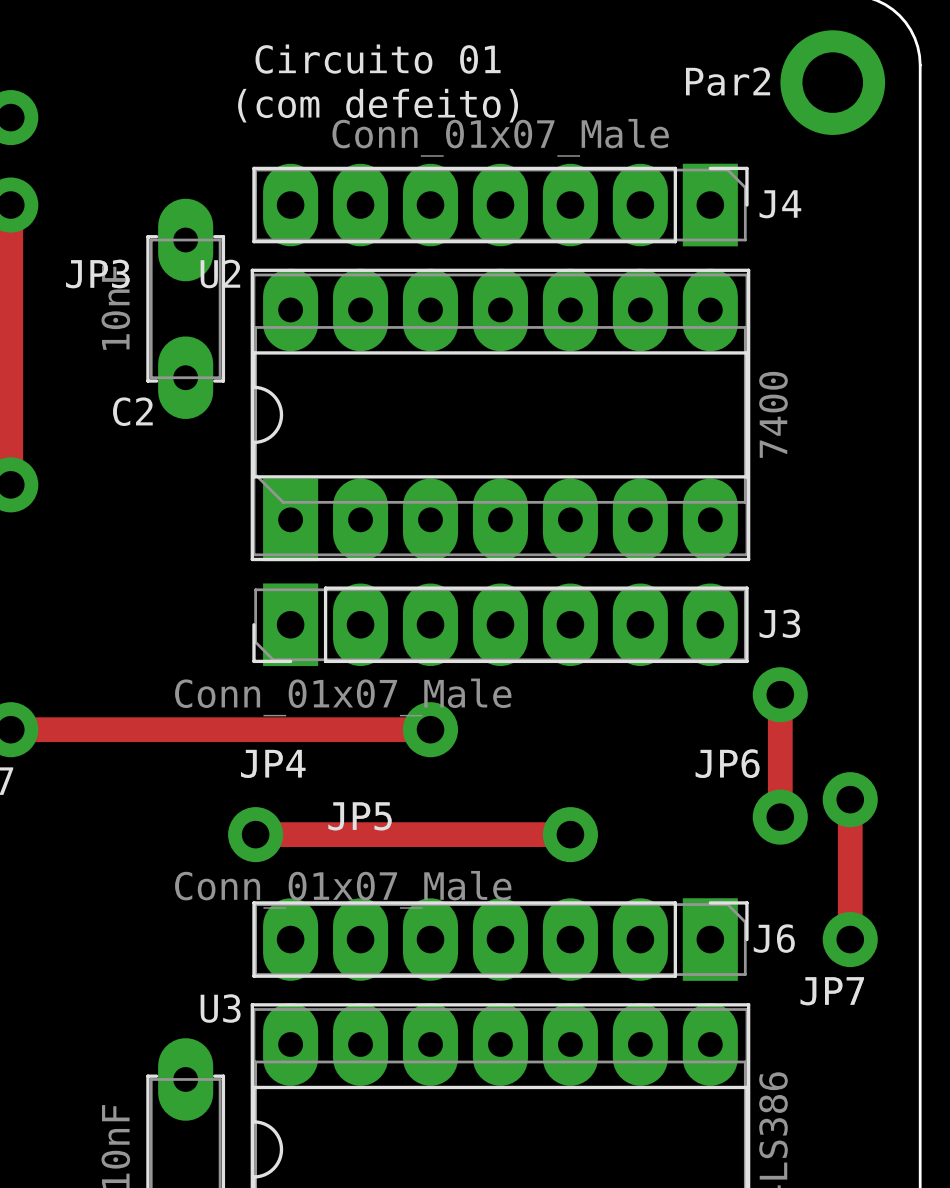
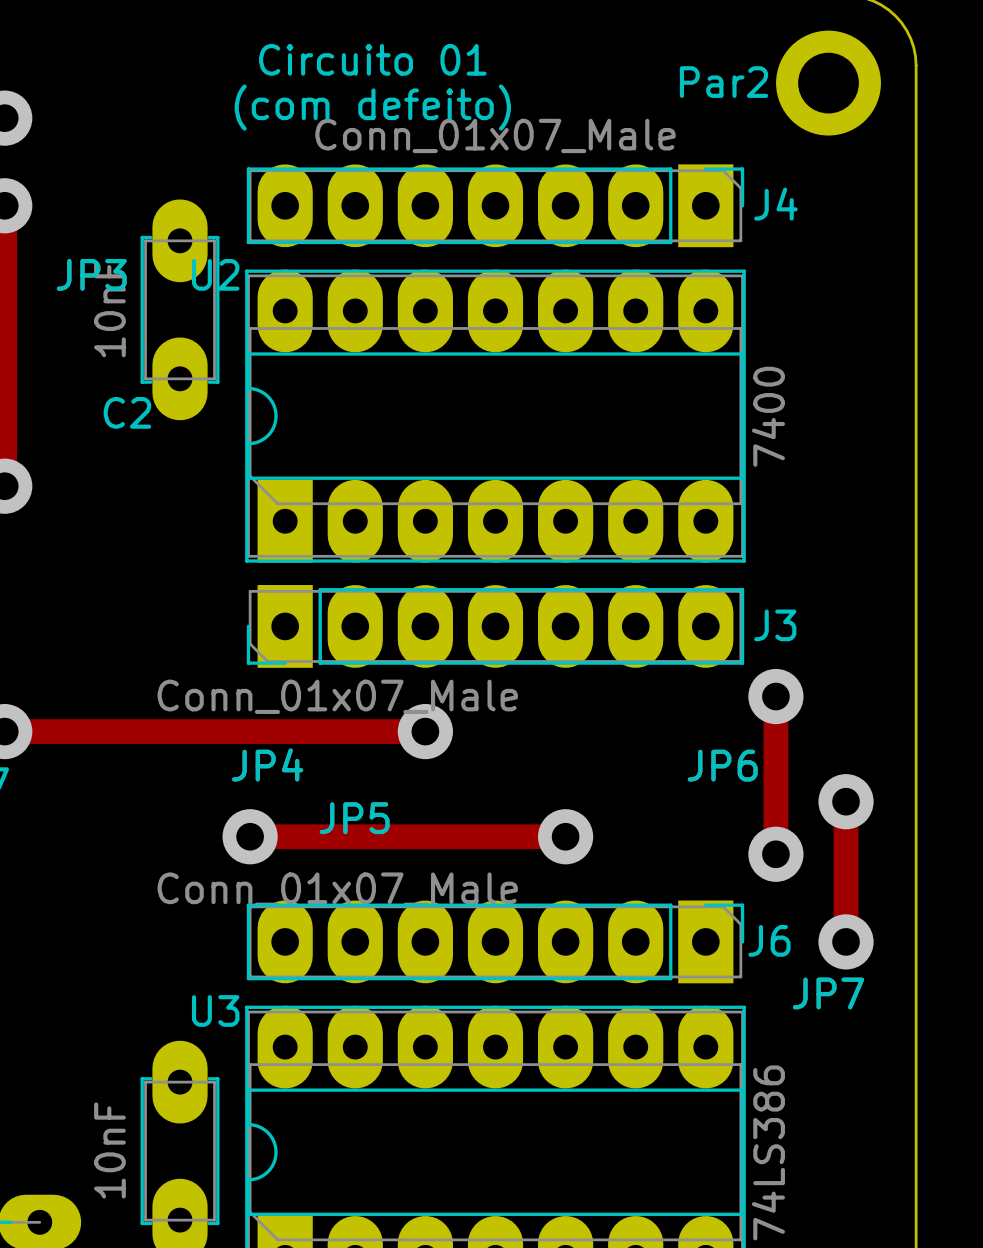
via position: (780, 817) -> (775, 854)

